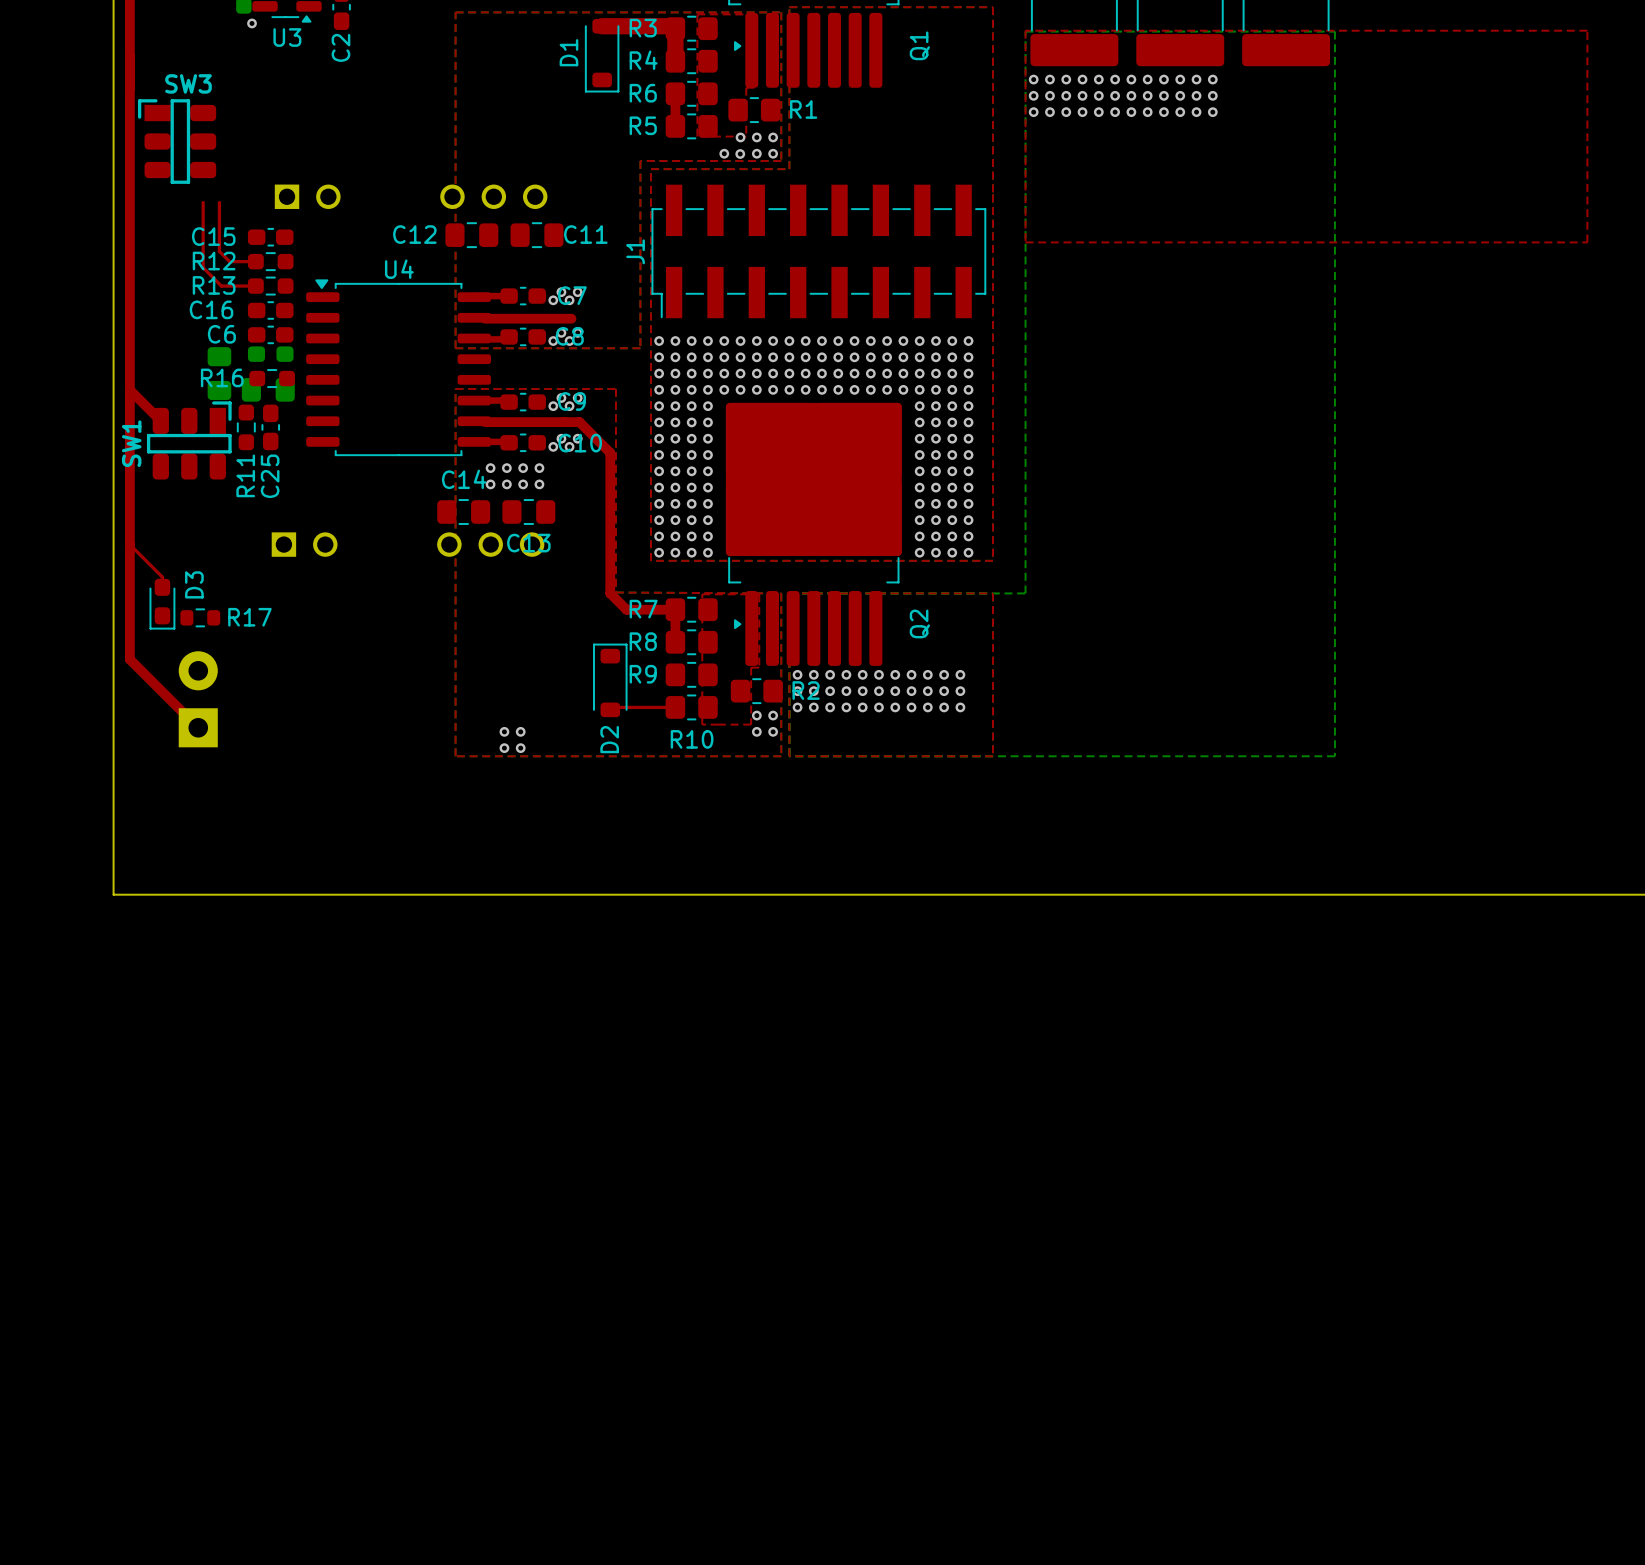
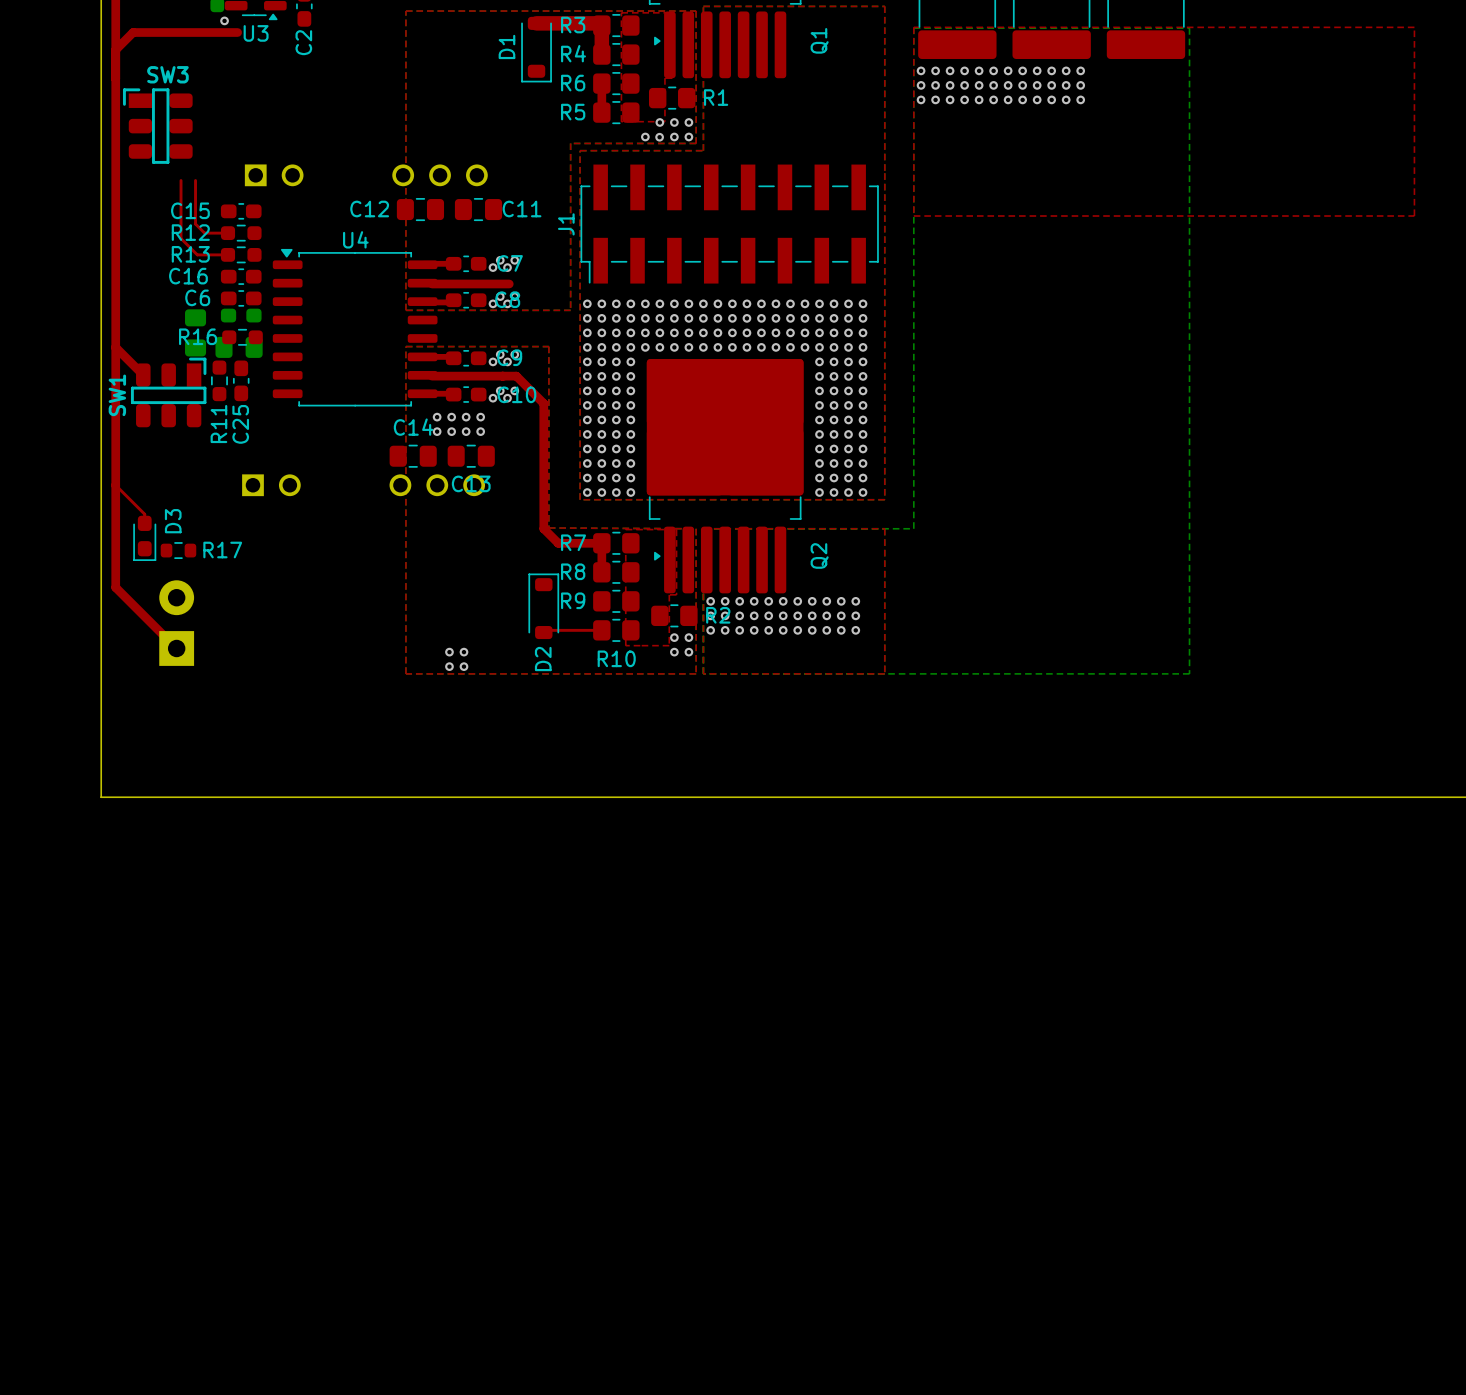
top track: none -> (237, 32) (133, 32) (115, 49)

